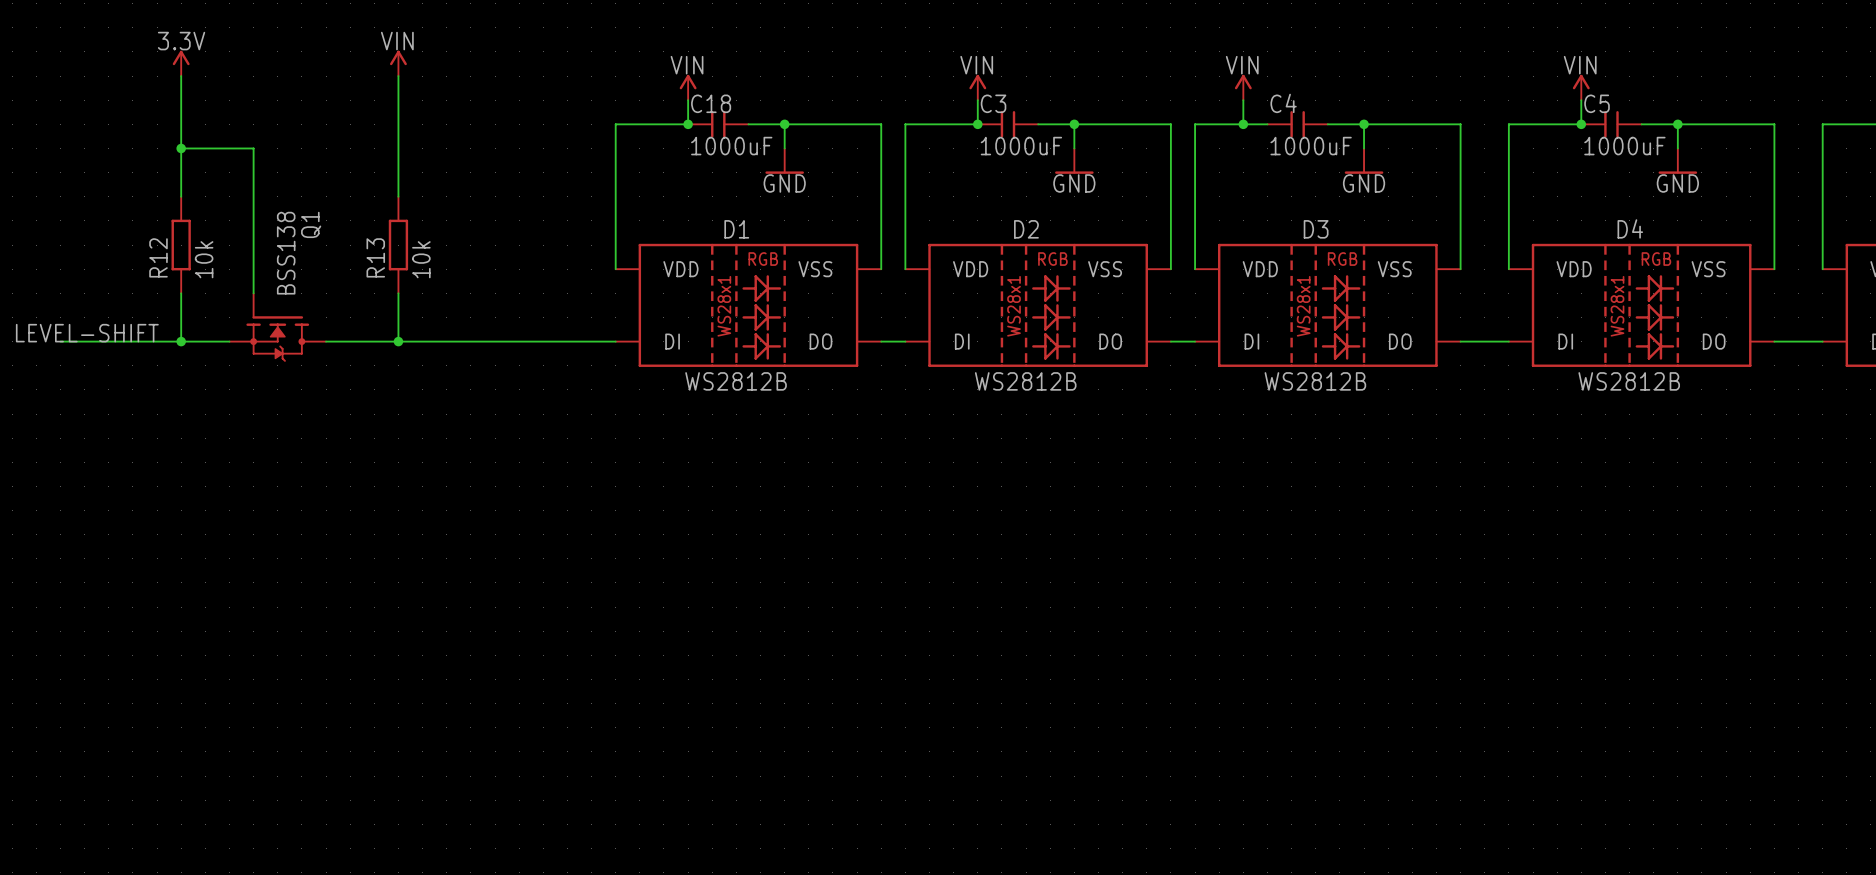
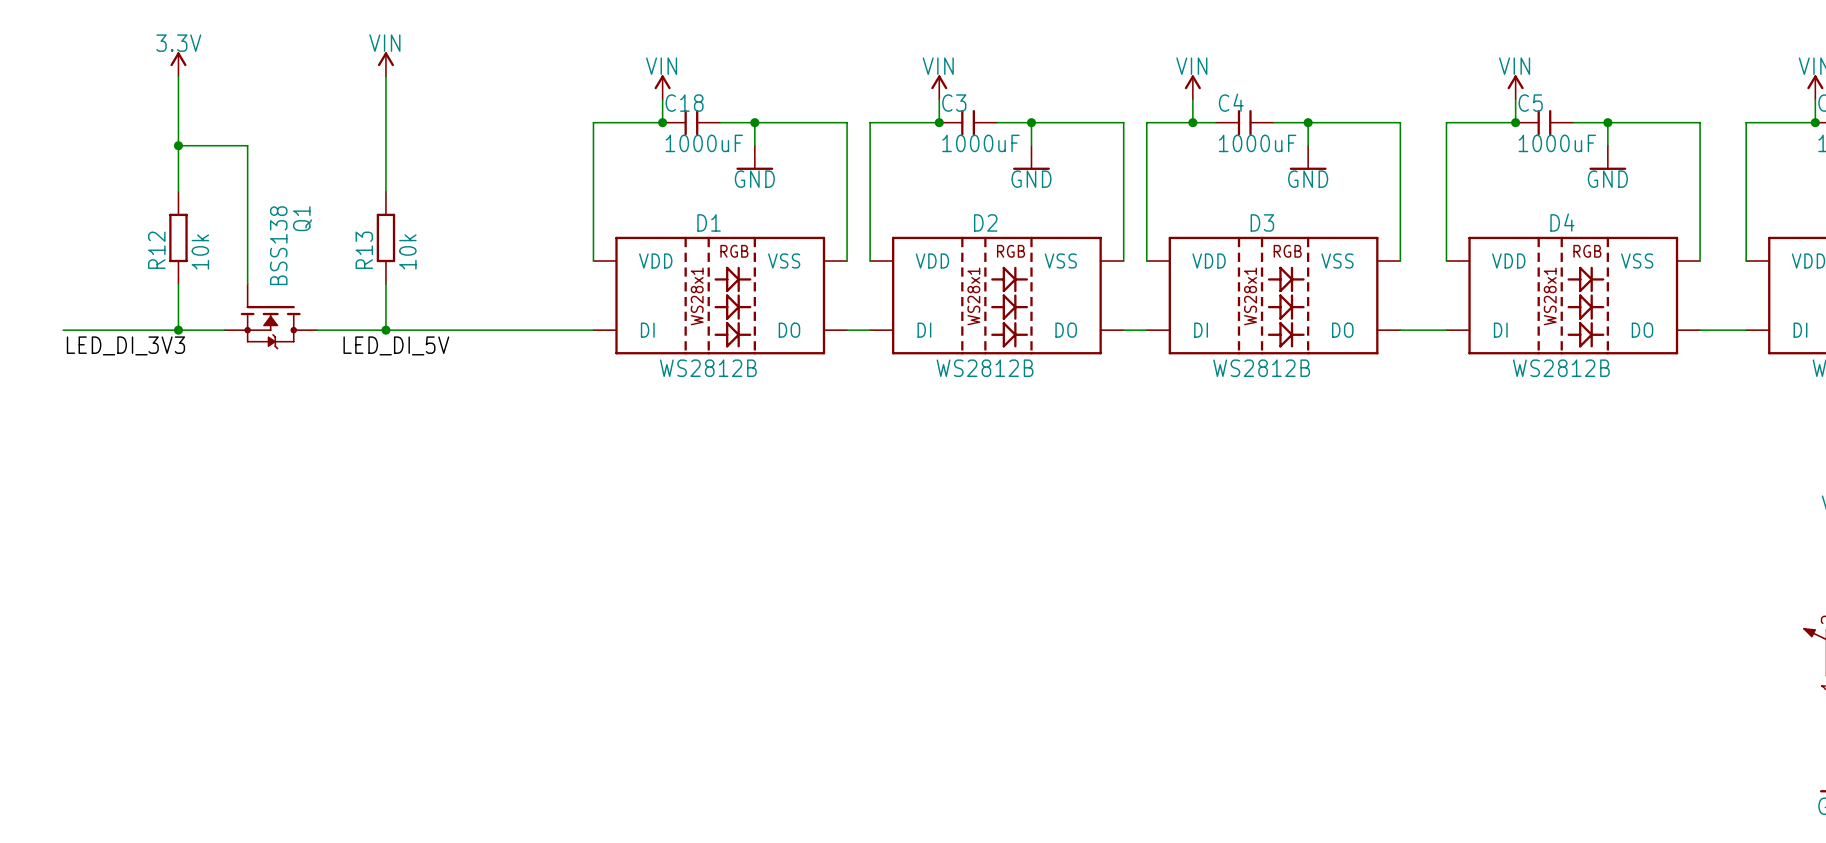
label: LEVEL-SHIFT (87, 333) -> none
label: none -> LED_DI_3V3 (125, 345)
label: none -> LED_DI_5V (396, 345)

